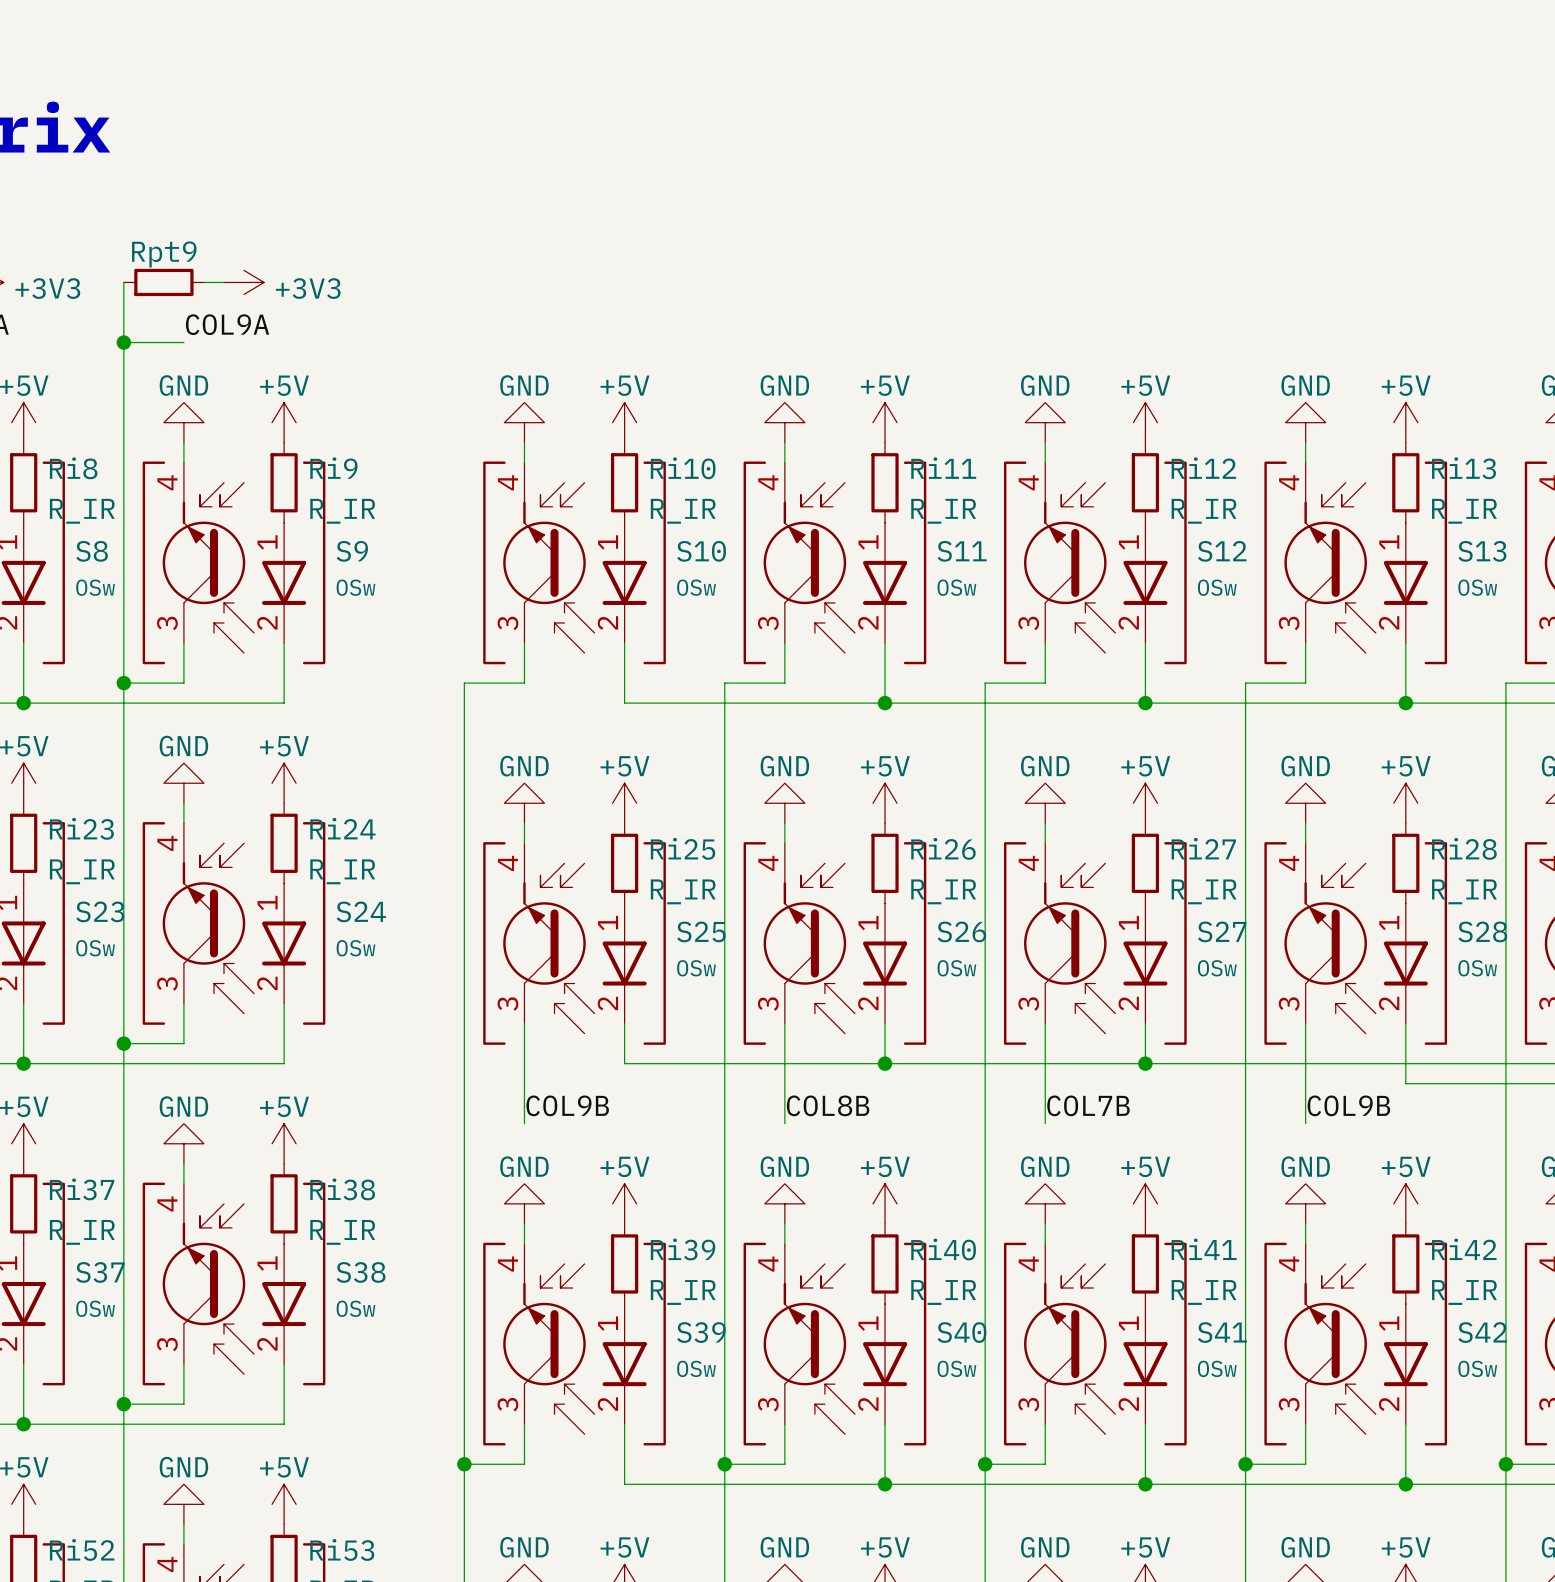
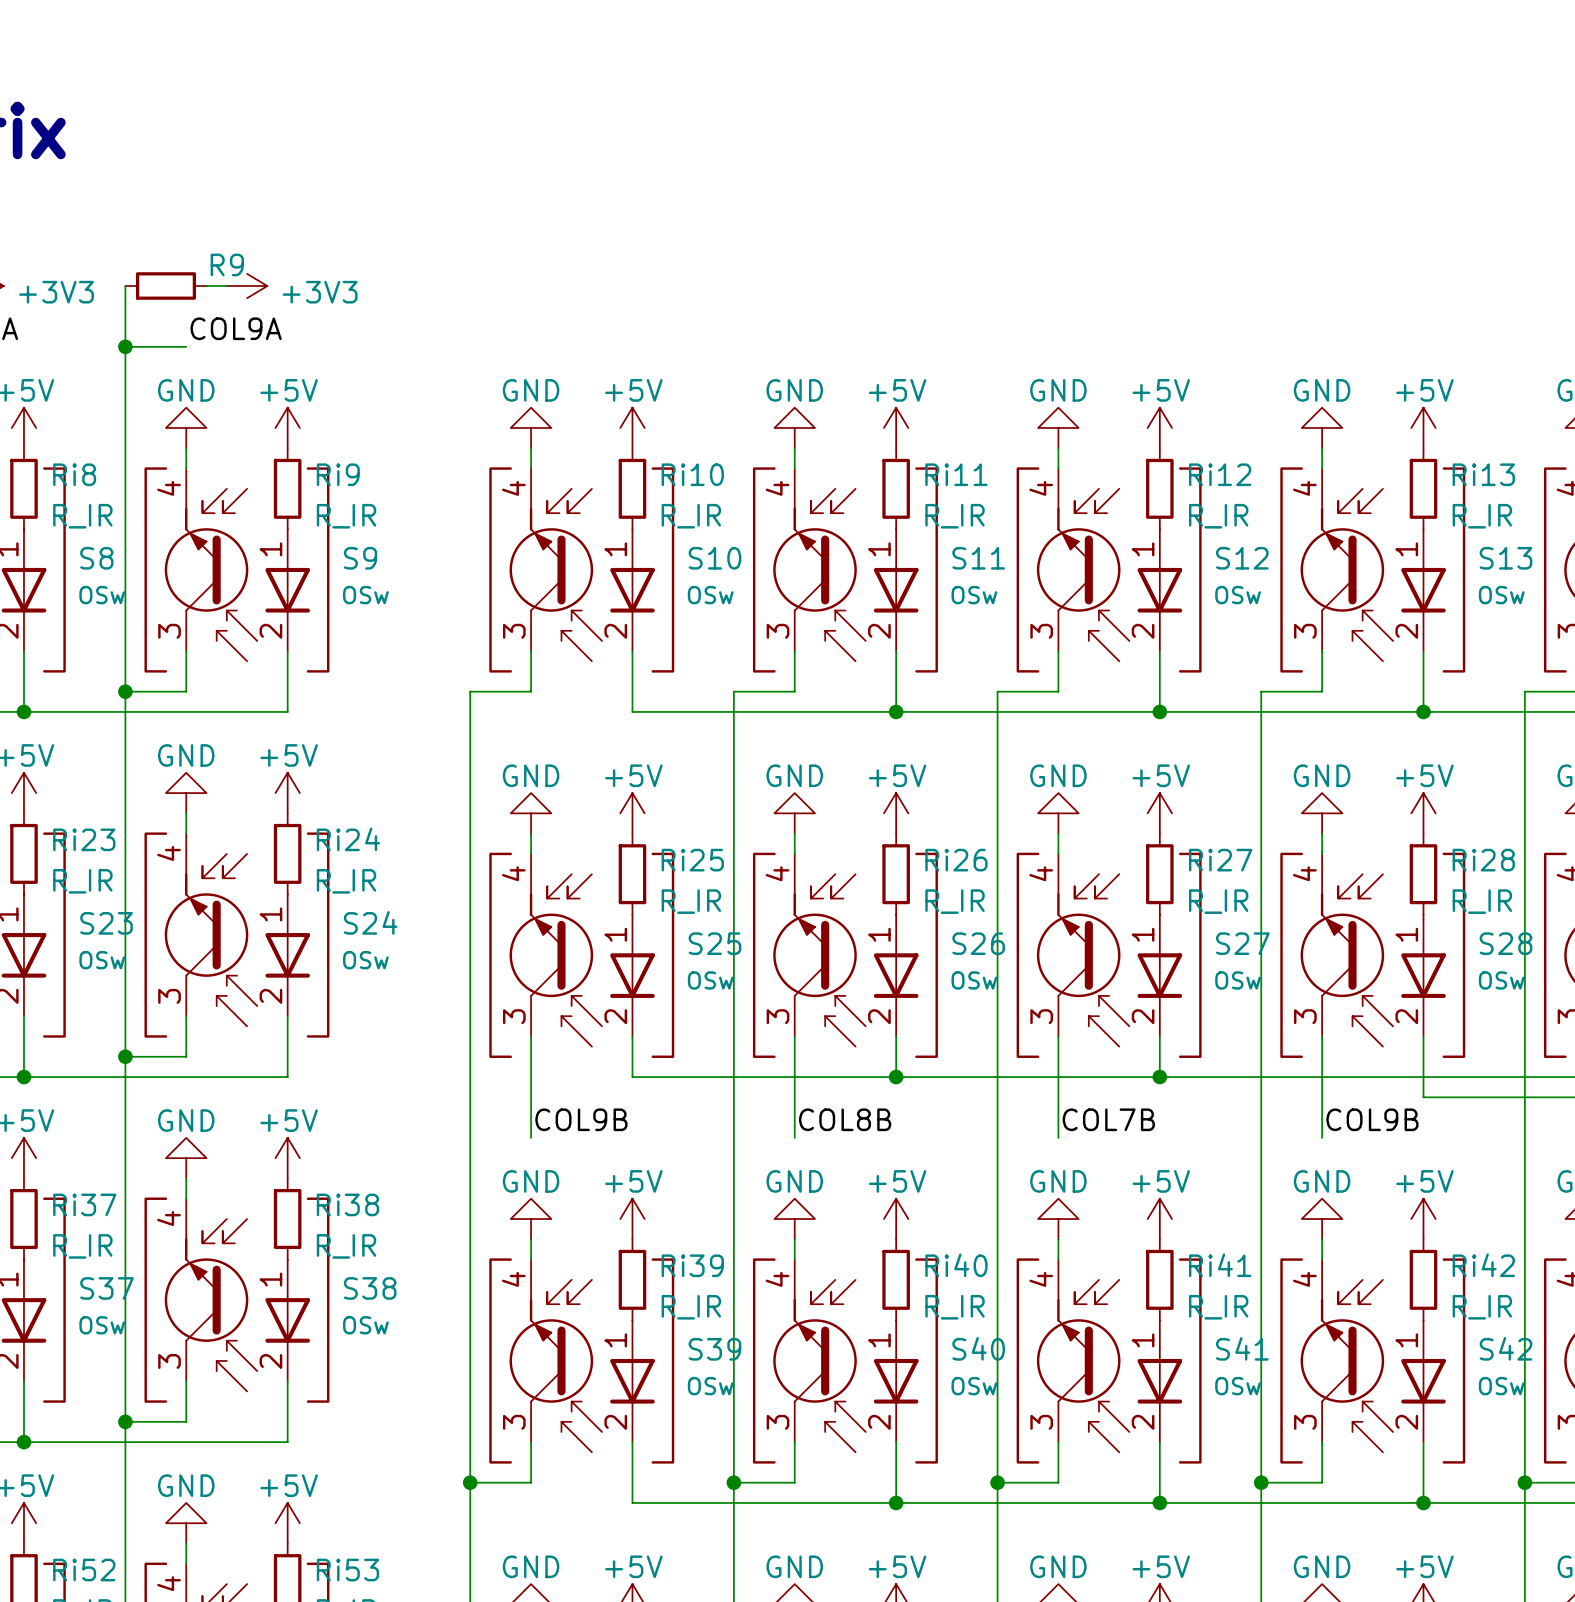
Rpt9 name: Rpt9 (164, 254) -> R9 (227, 264)

